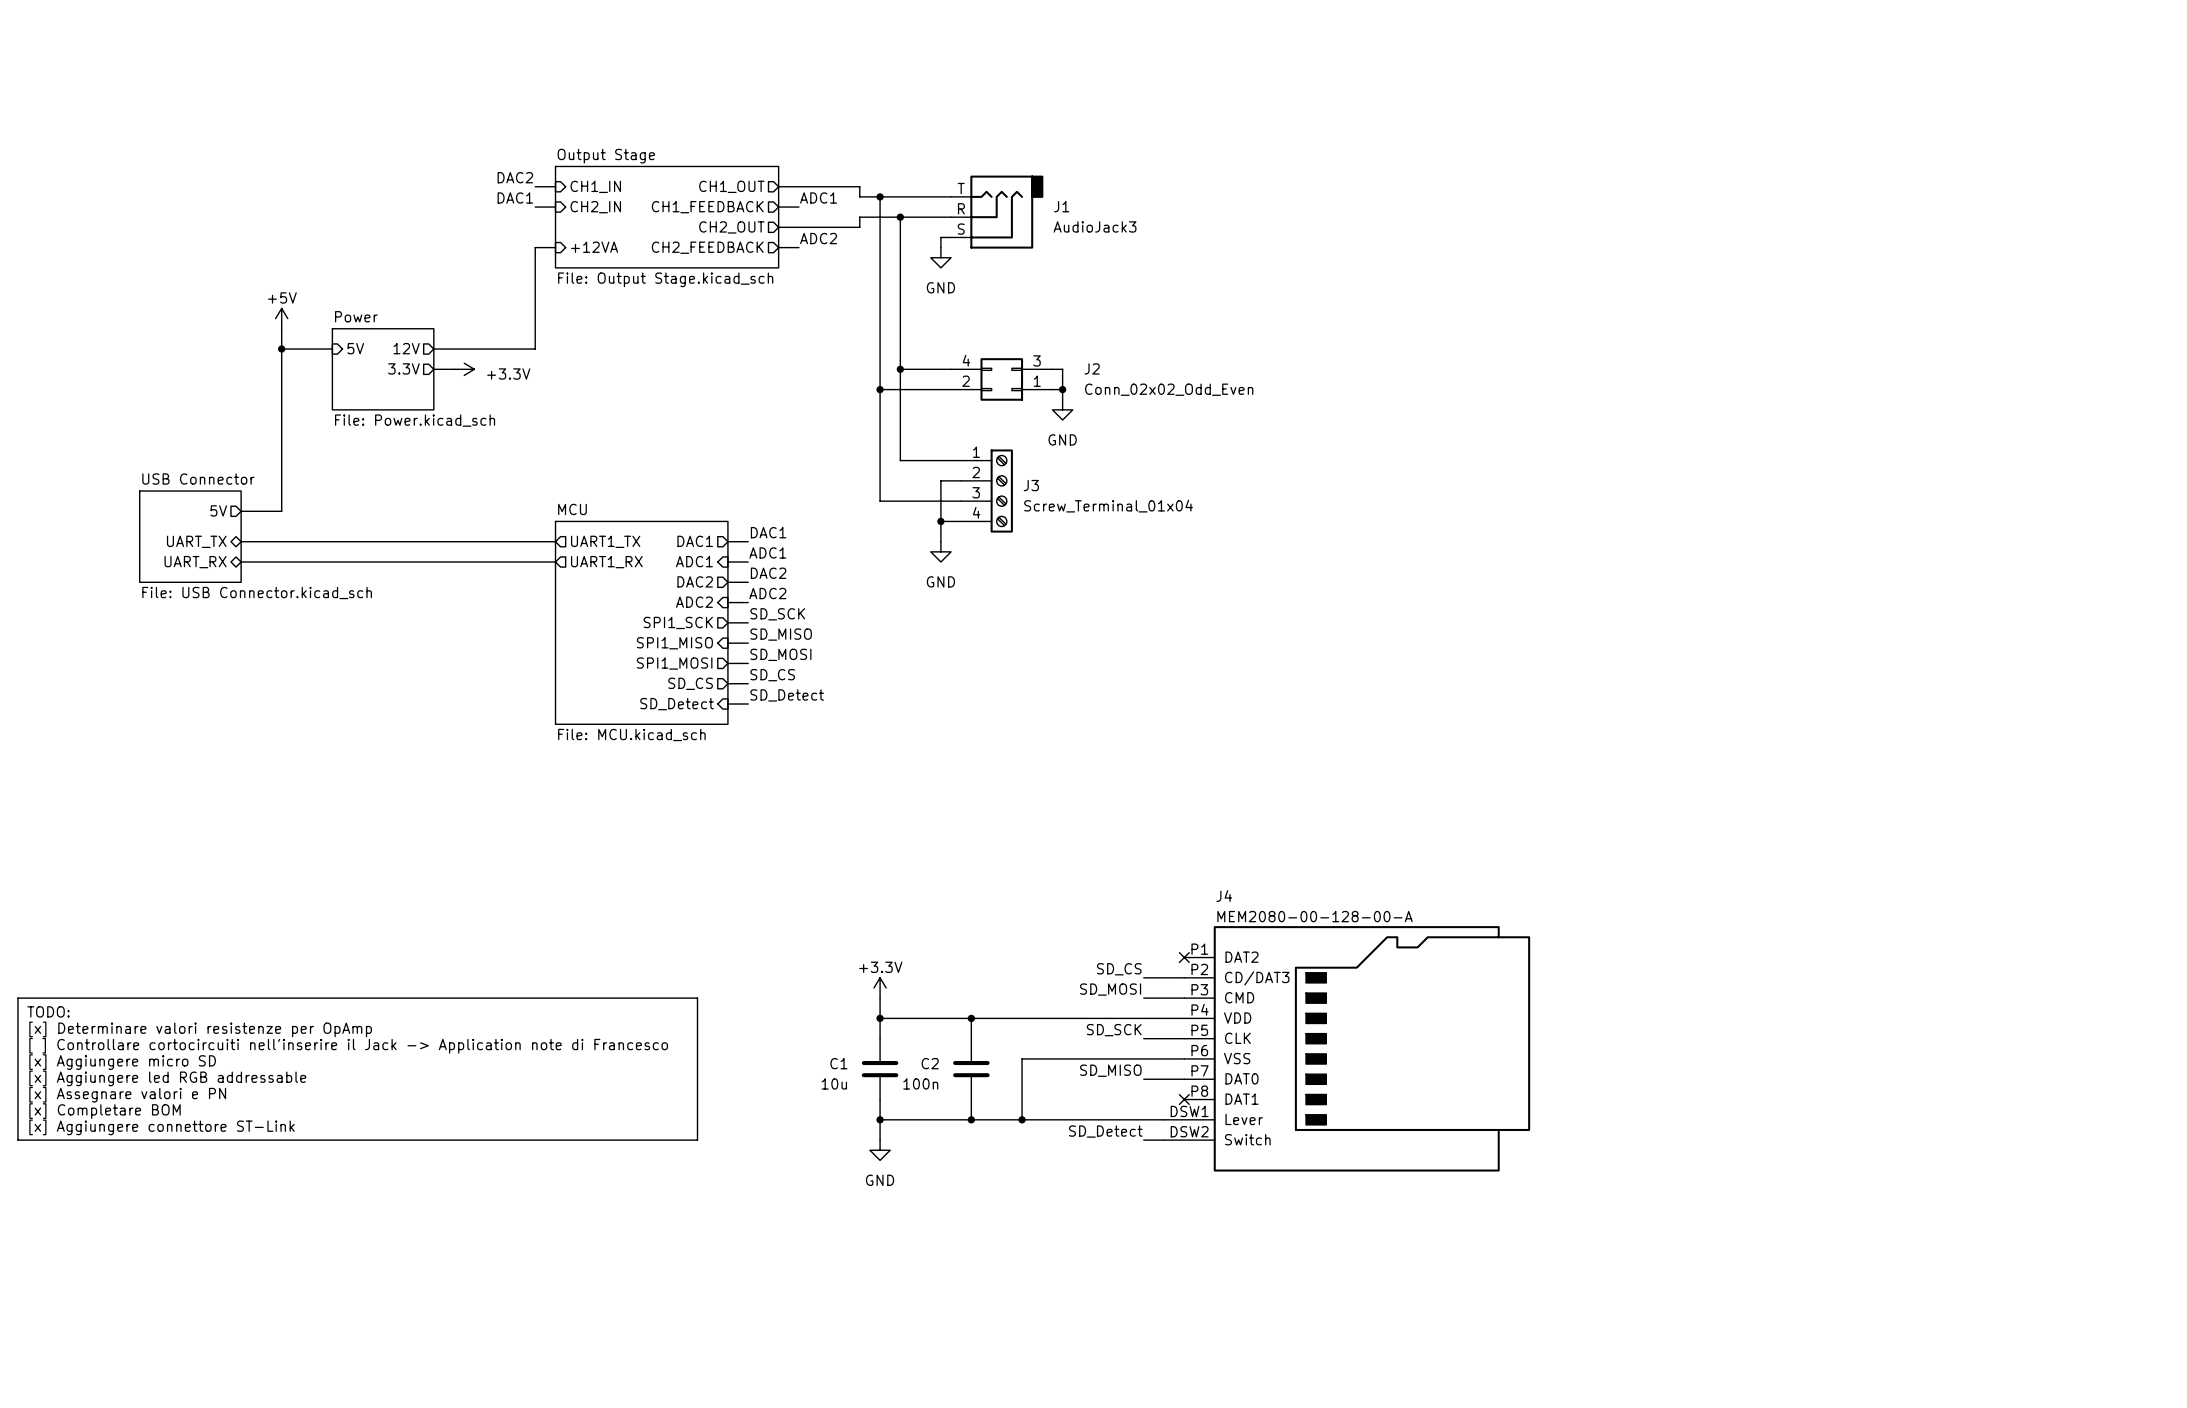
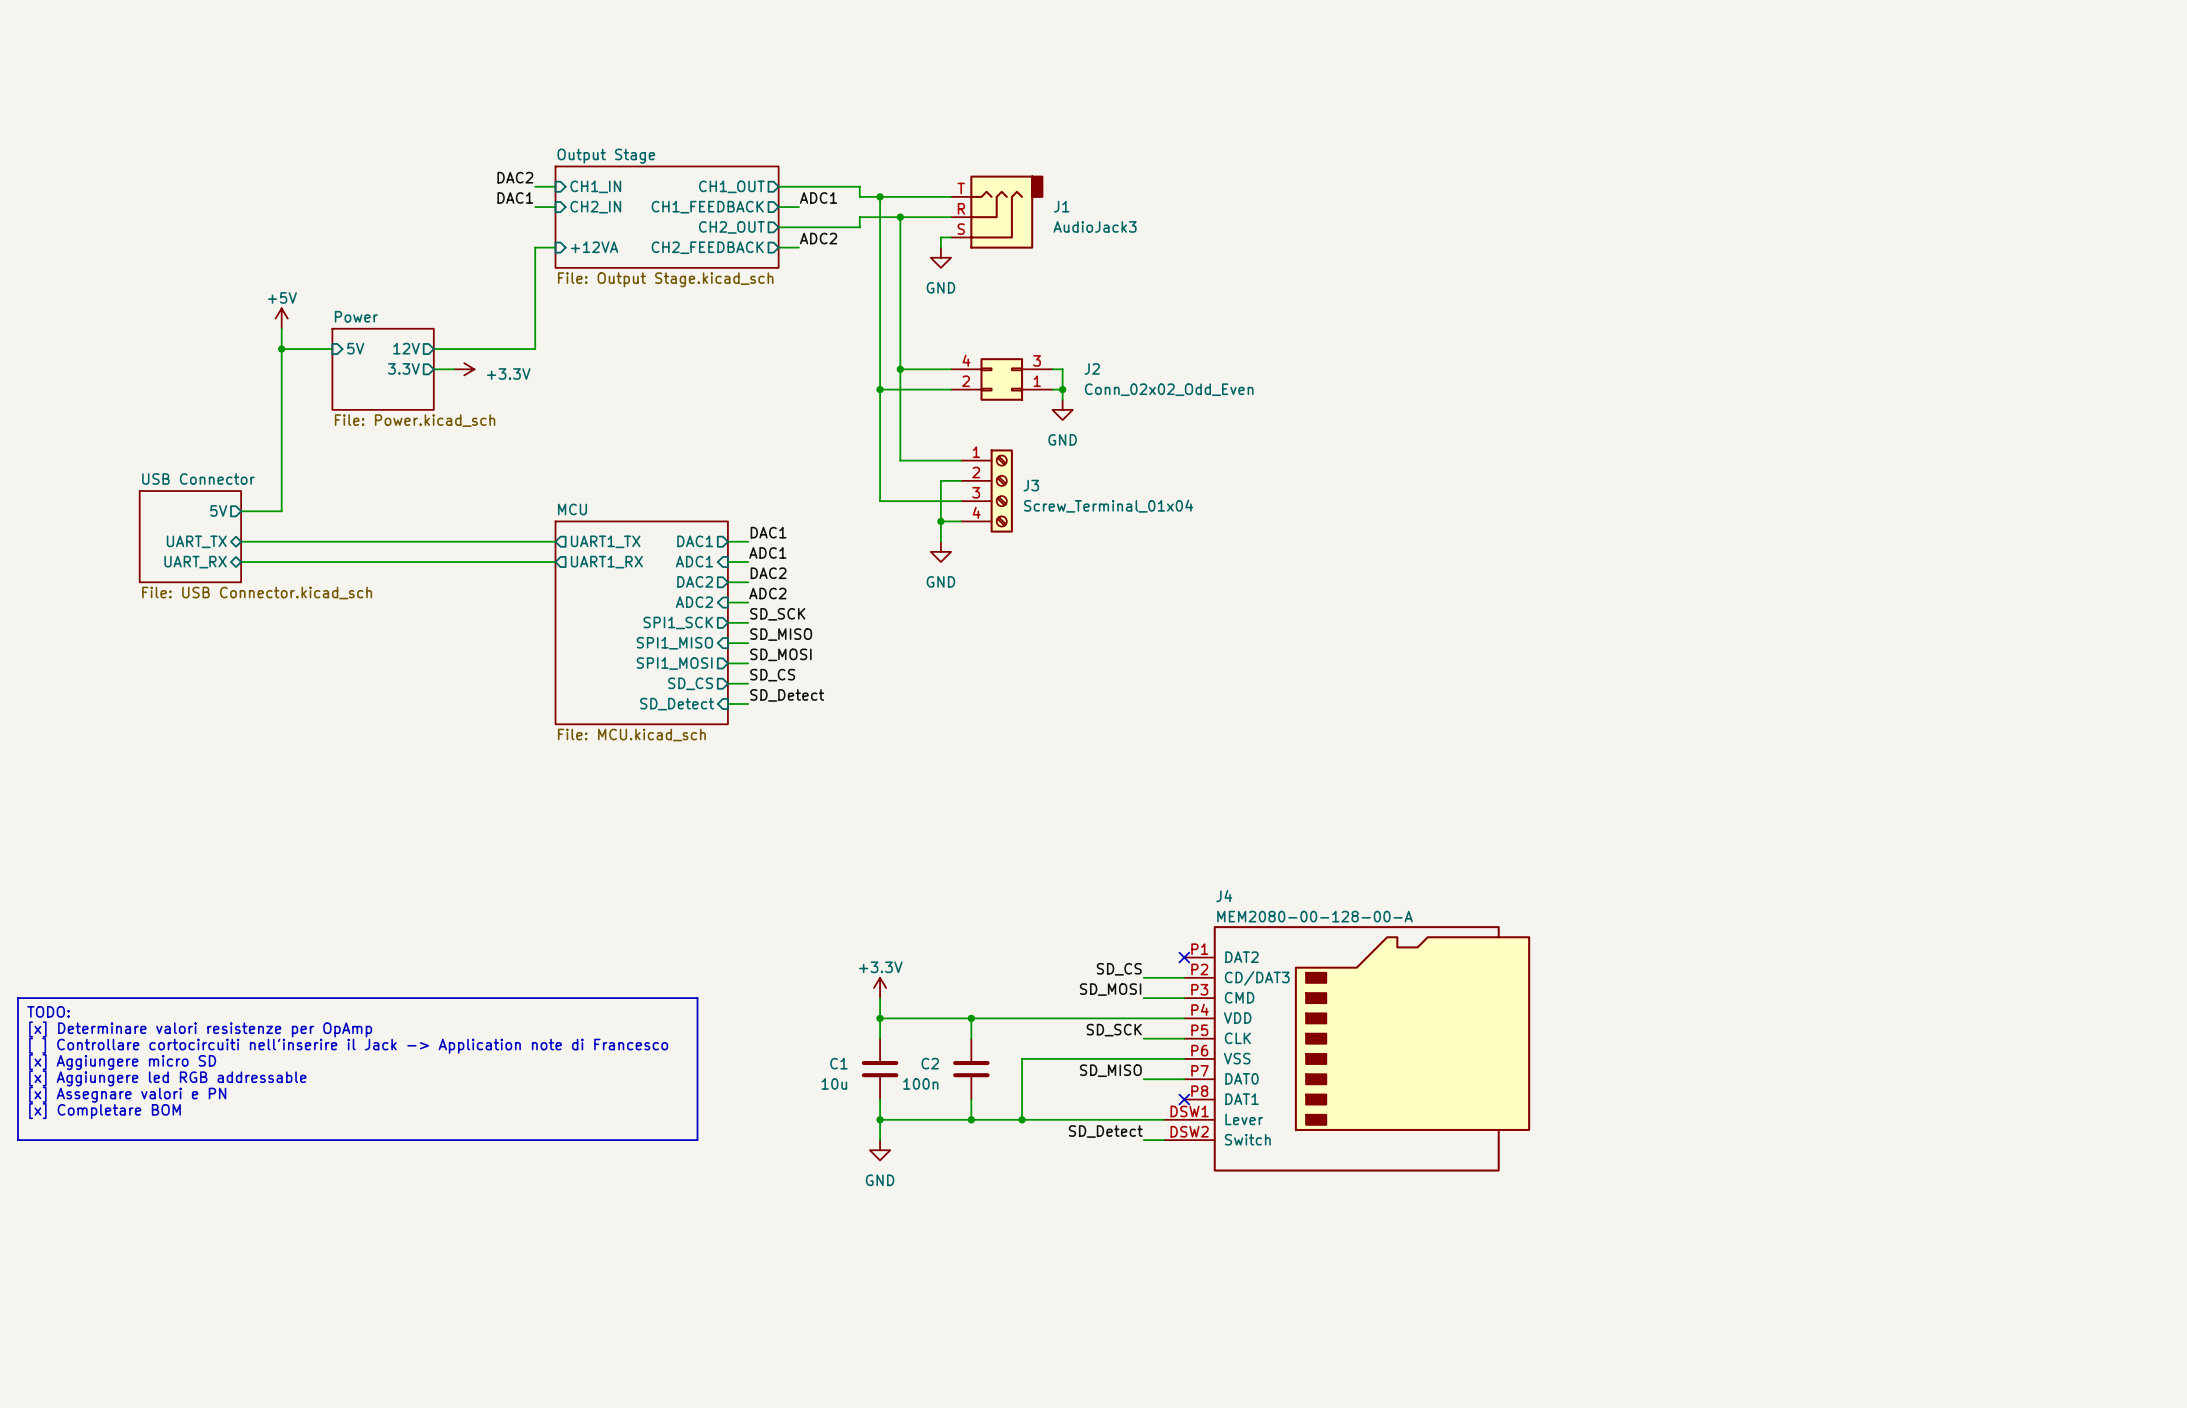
text: [x] Aggiungere connettore ST-Link (161, 1127) -> none

